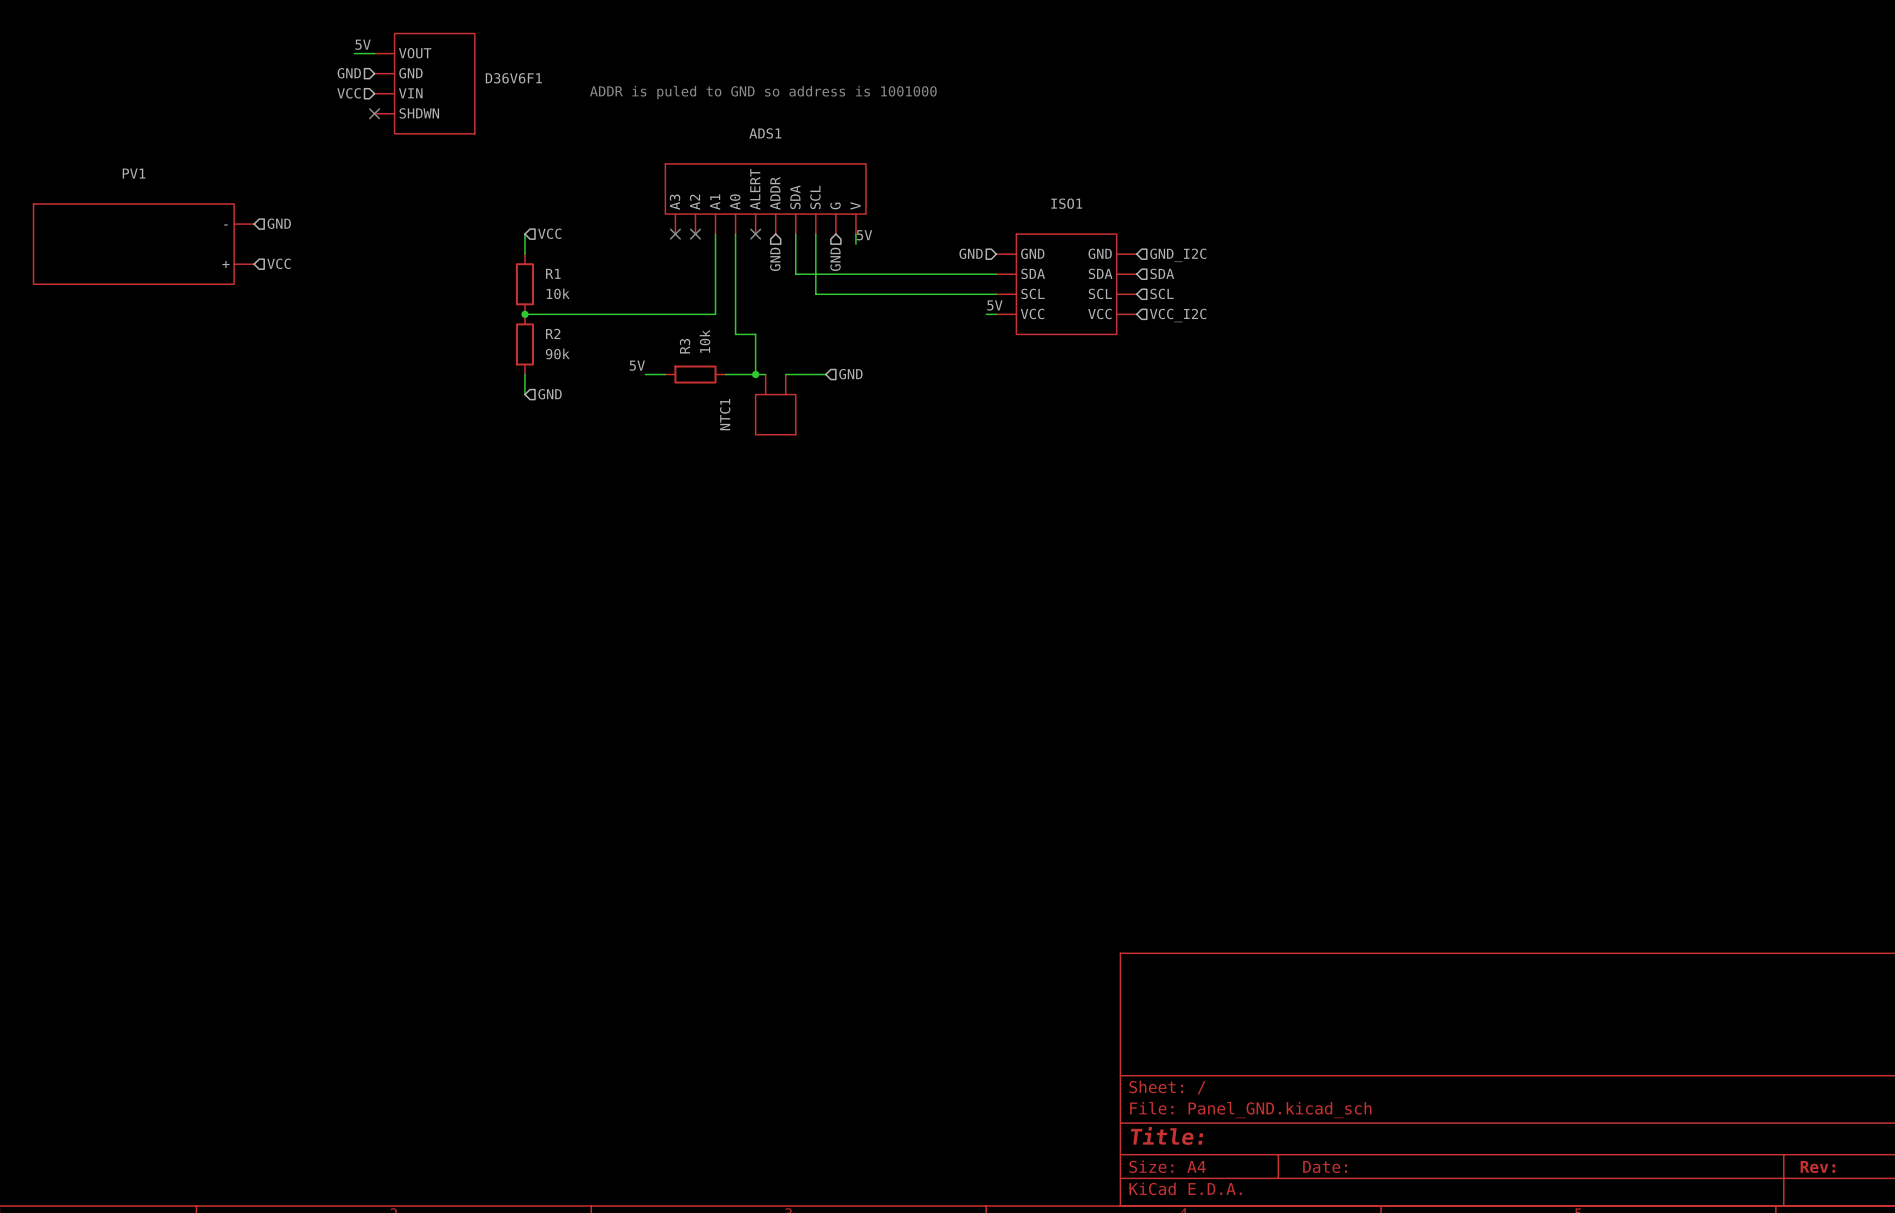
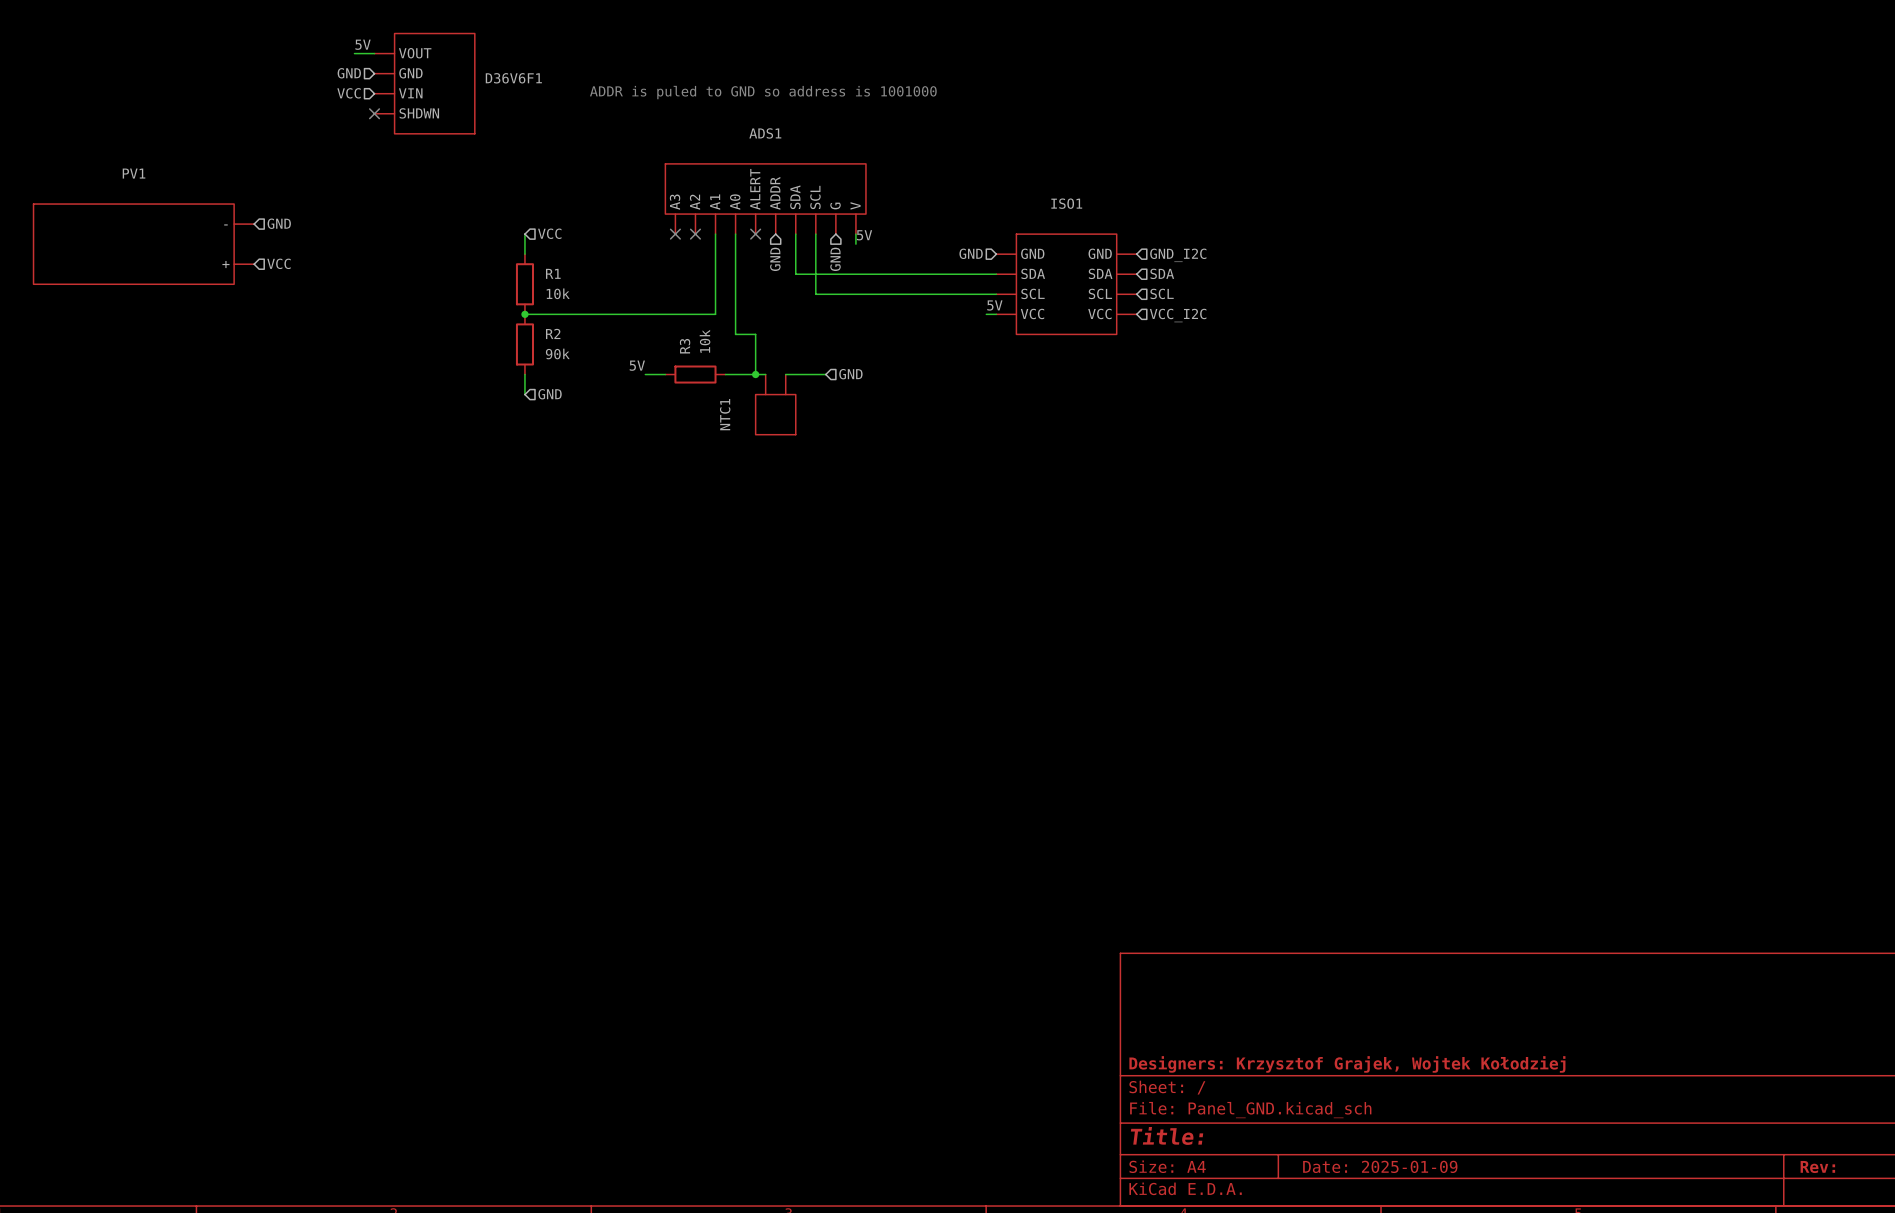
title block: none -> Designers: Krzysztof Grajek, Wojtek Kołodziej (1347, 1064)
title block: Date: (1325, 1166) -> Date: 2025-01-09 (1380, 1166)

